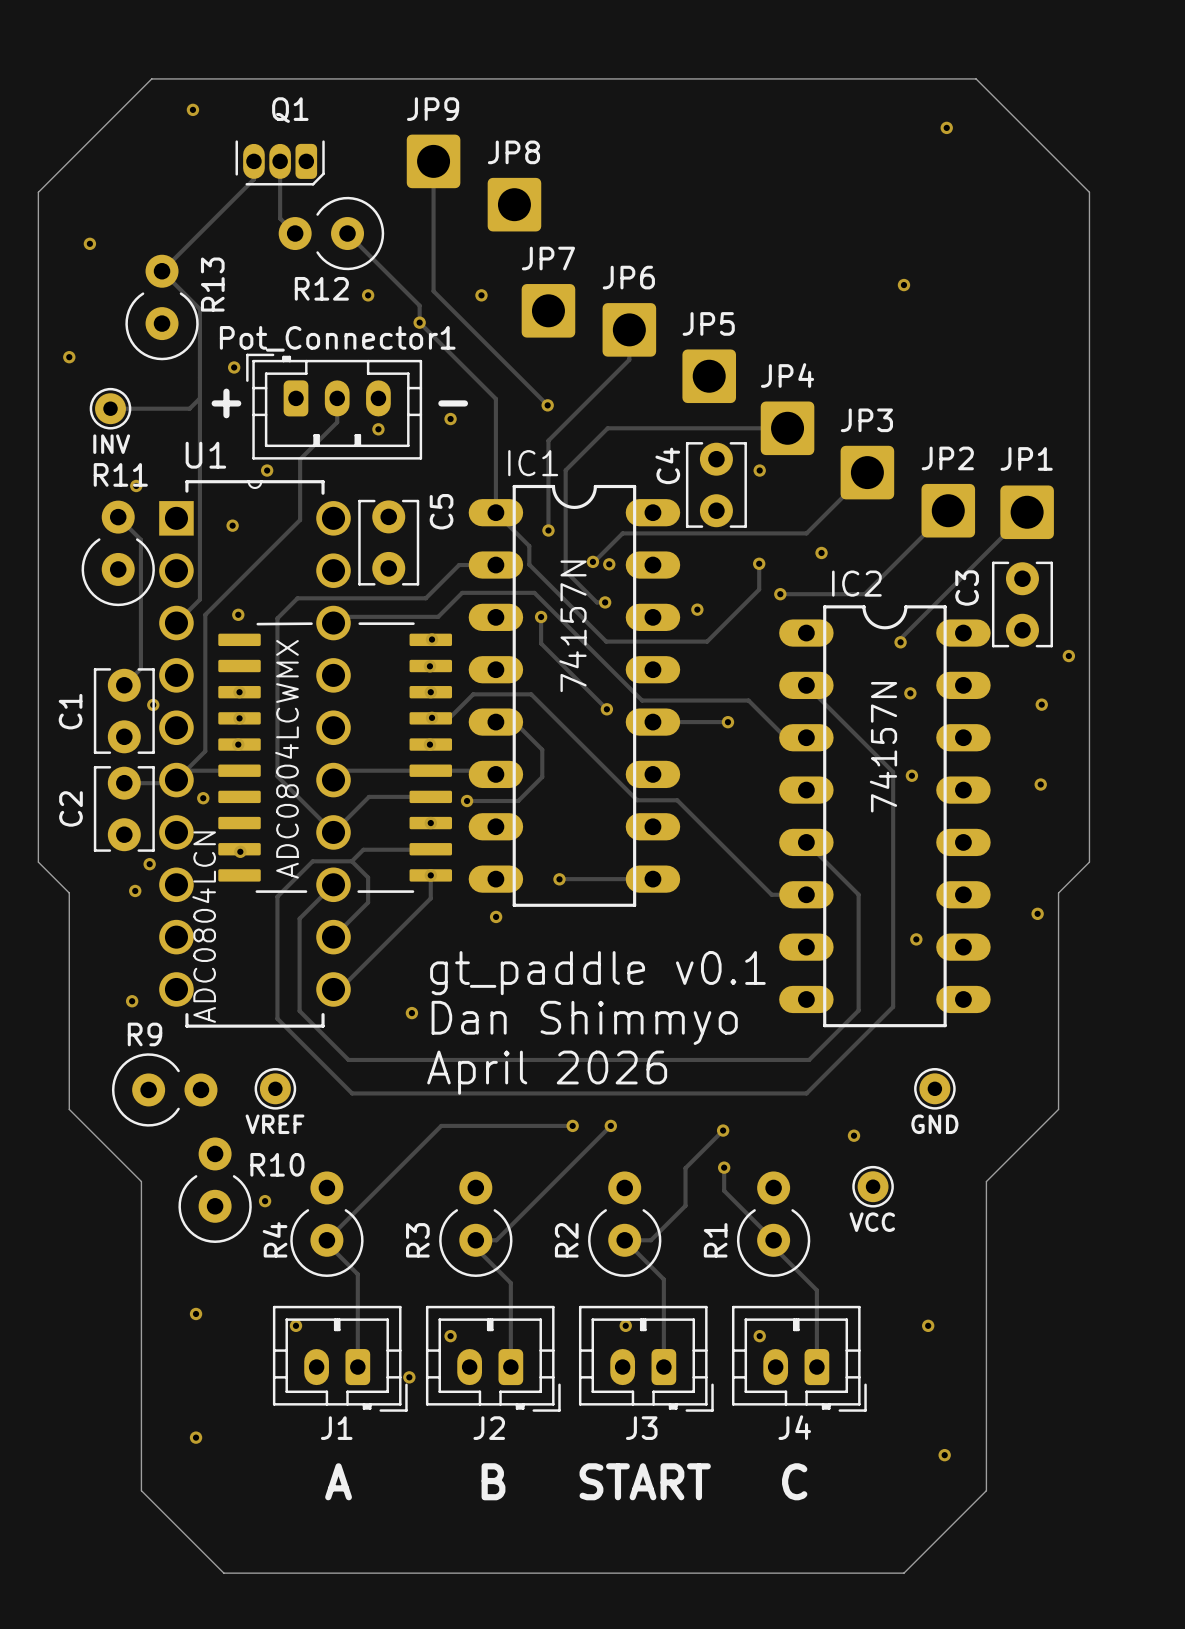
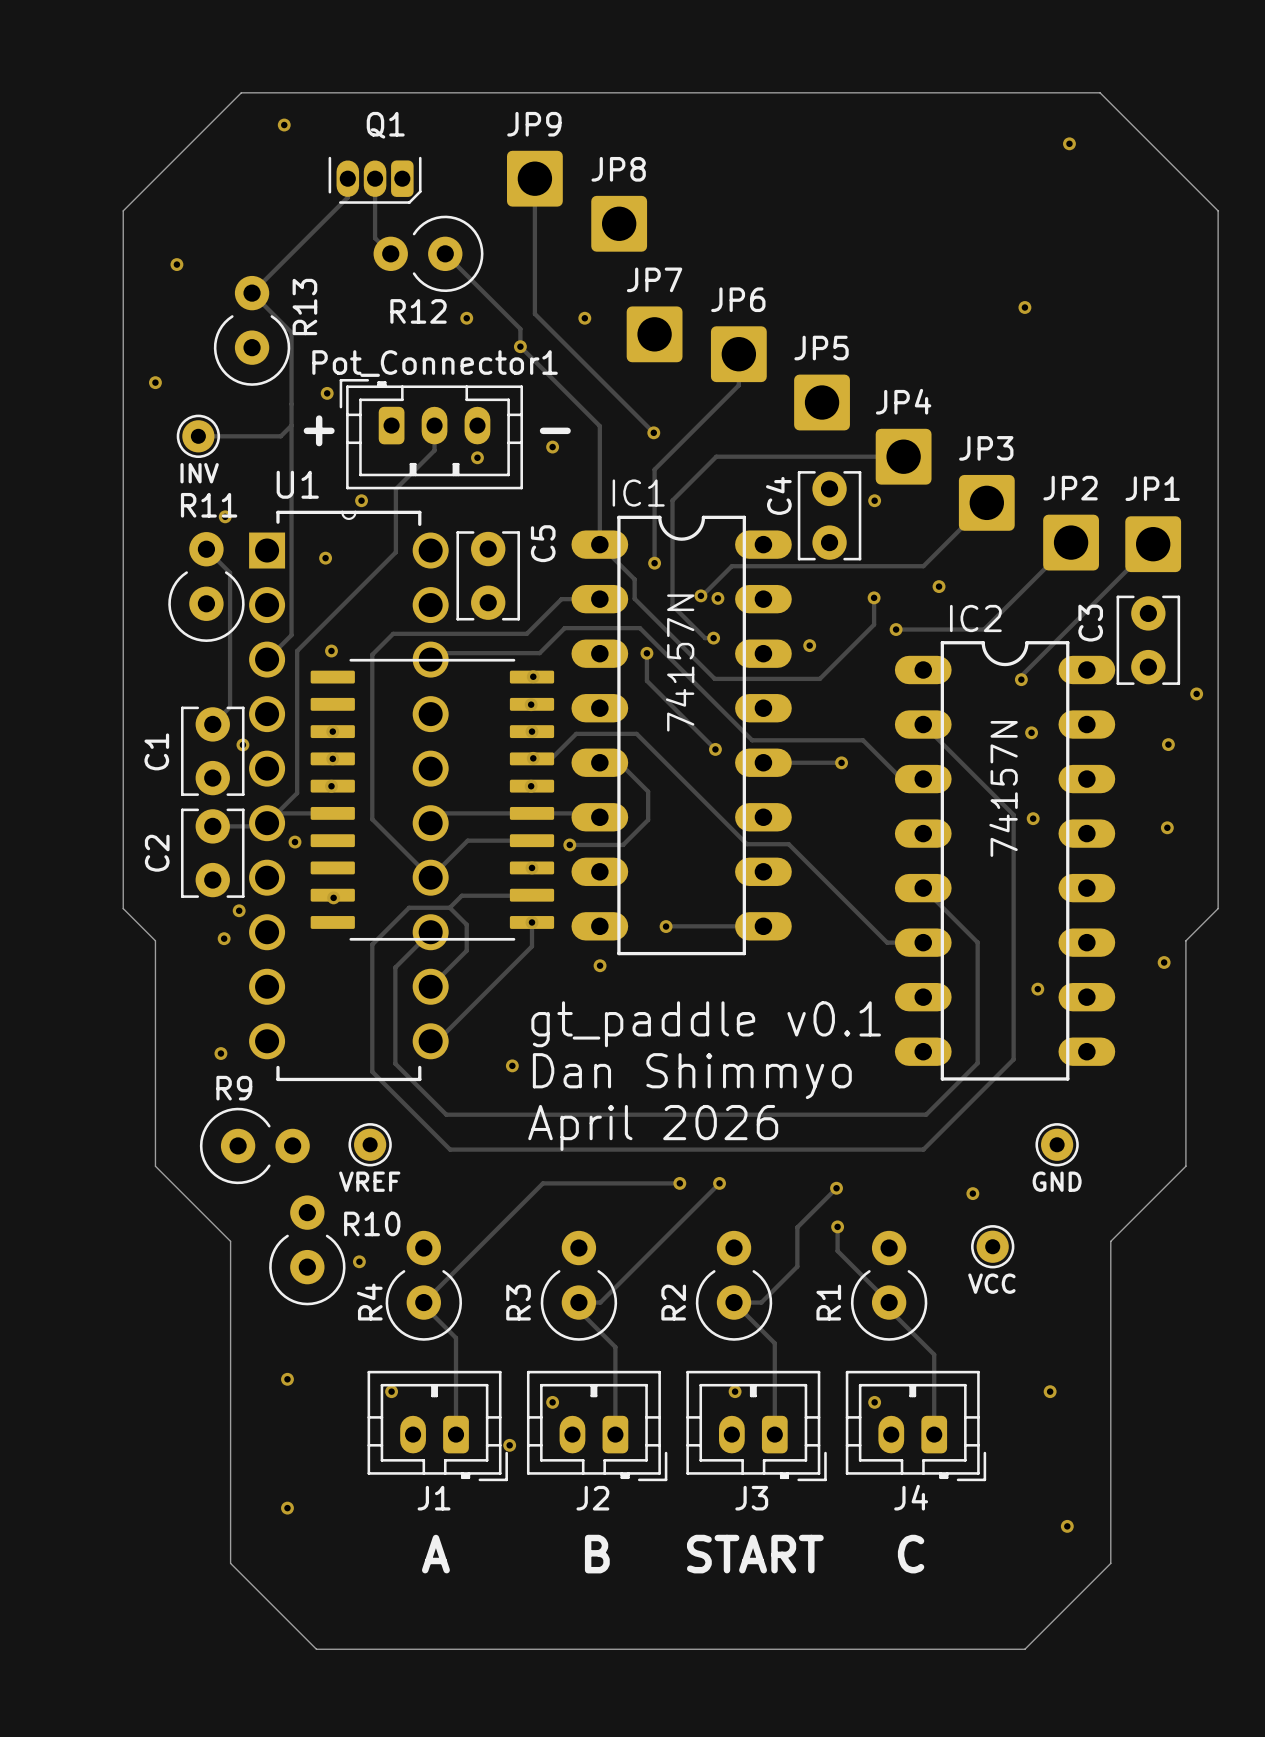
U1 footprint: [159, 480, 453, 1028] -> [249, 510, 555, 1082]

